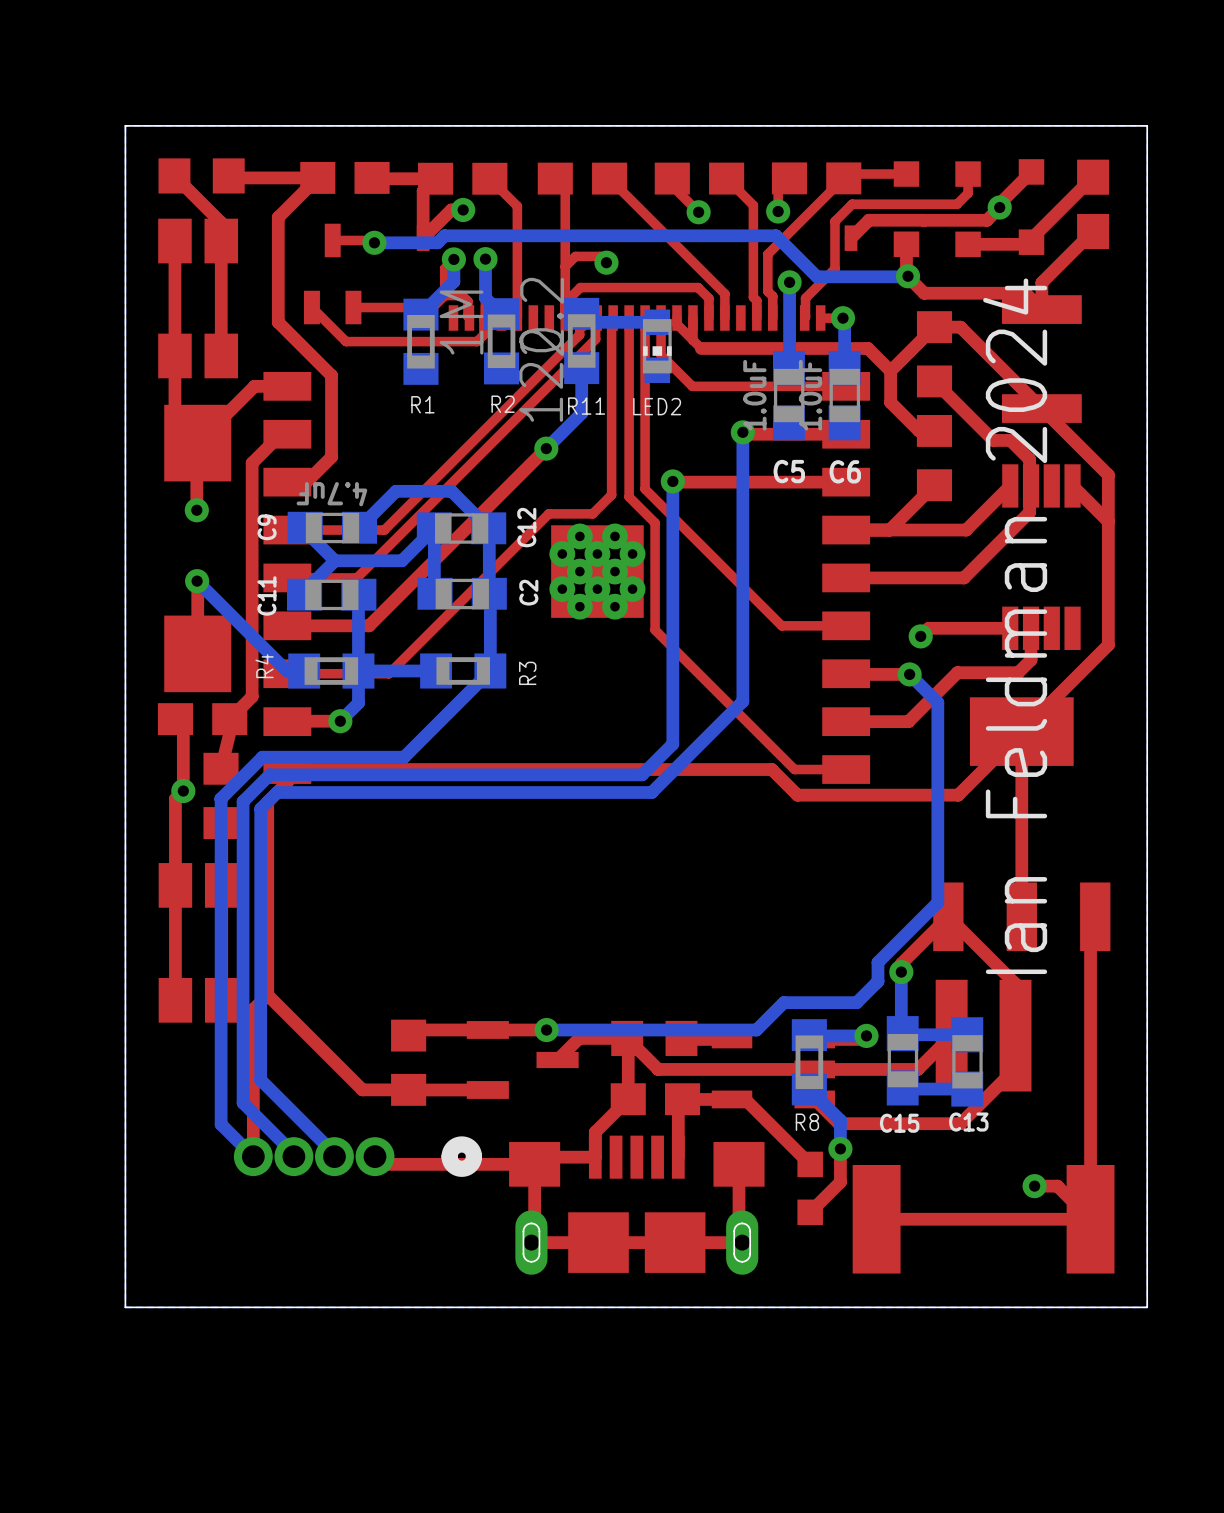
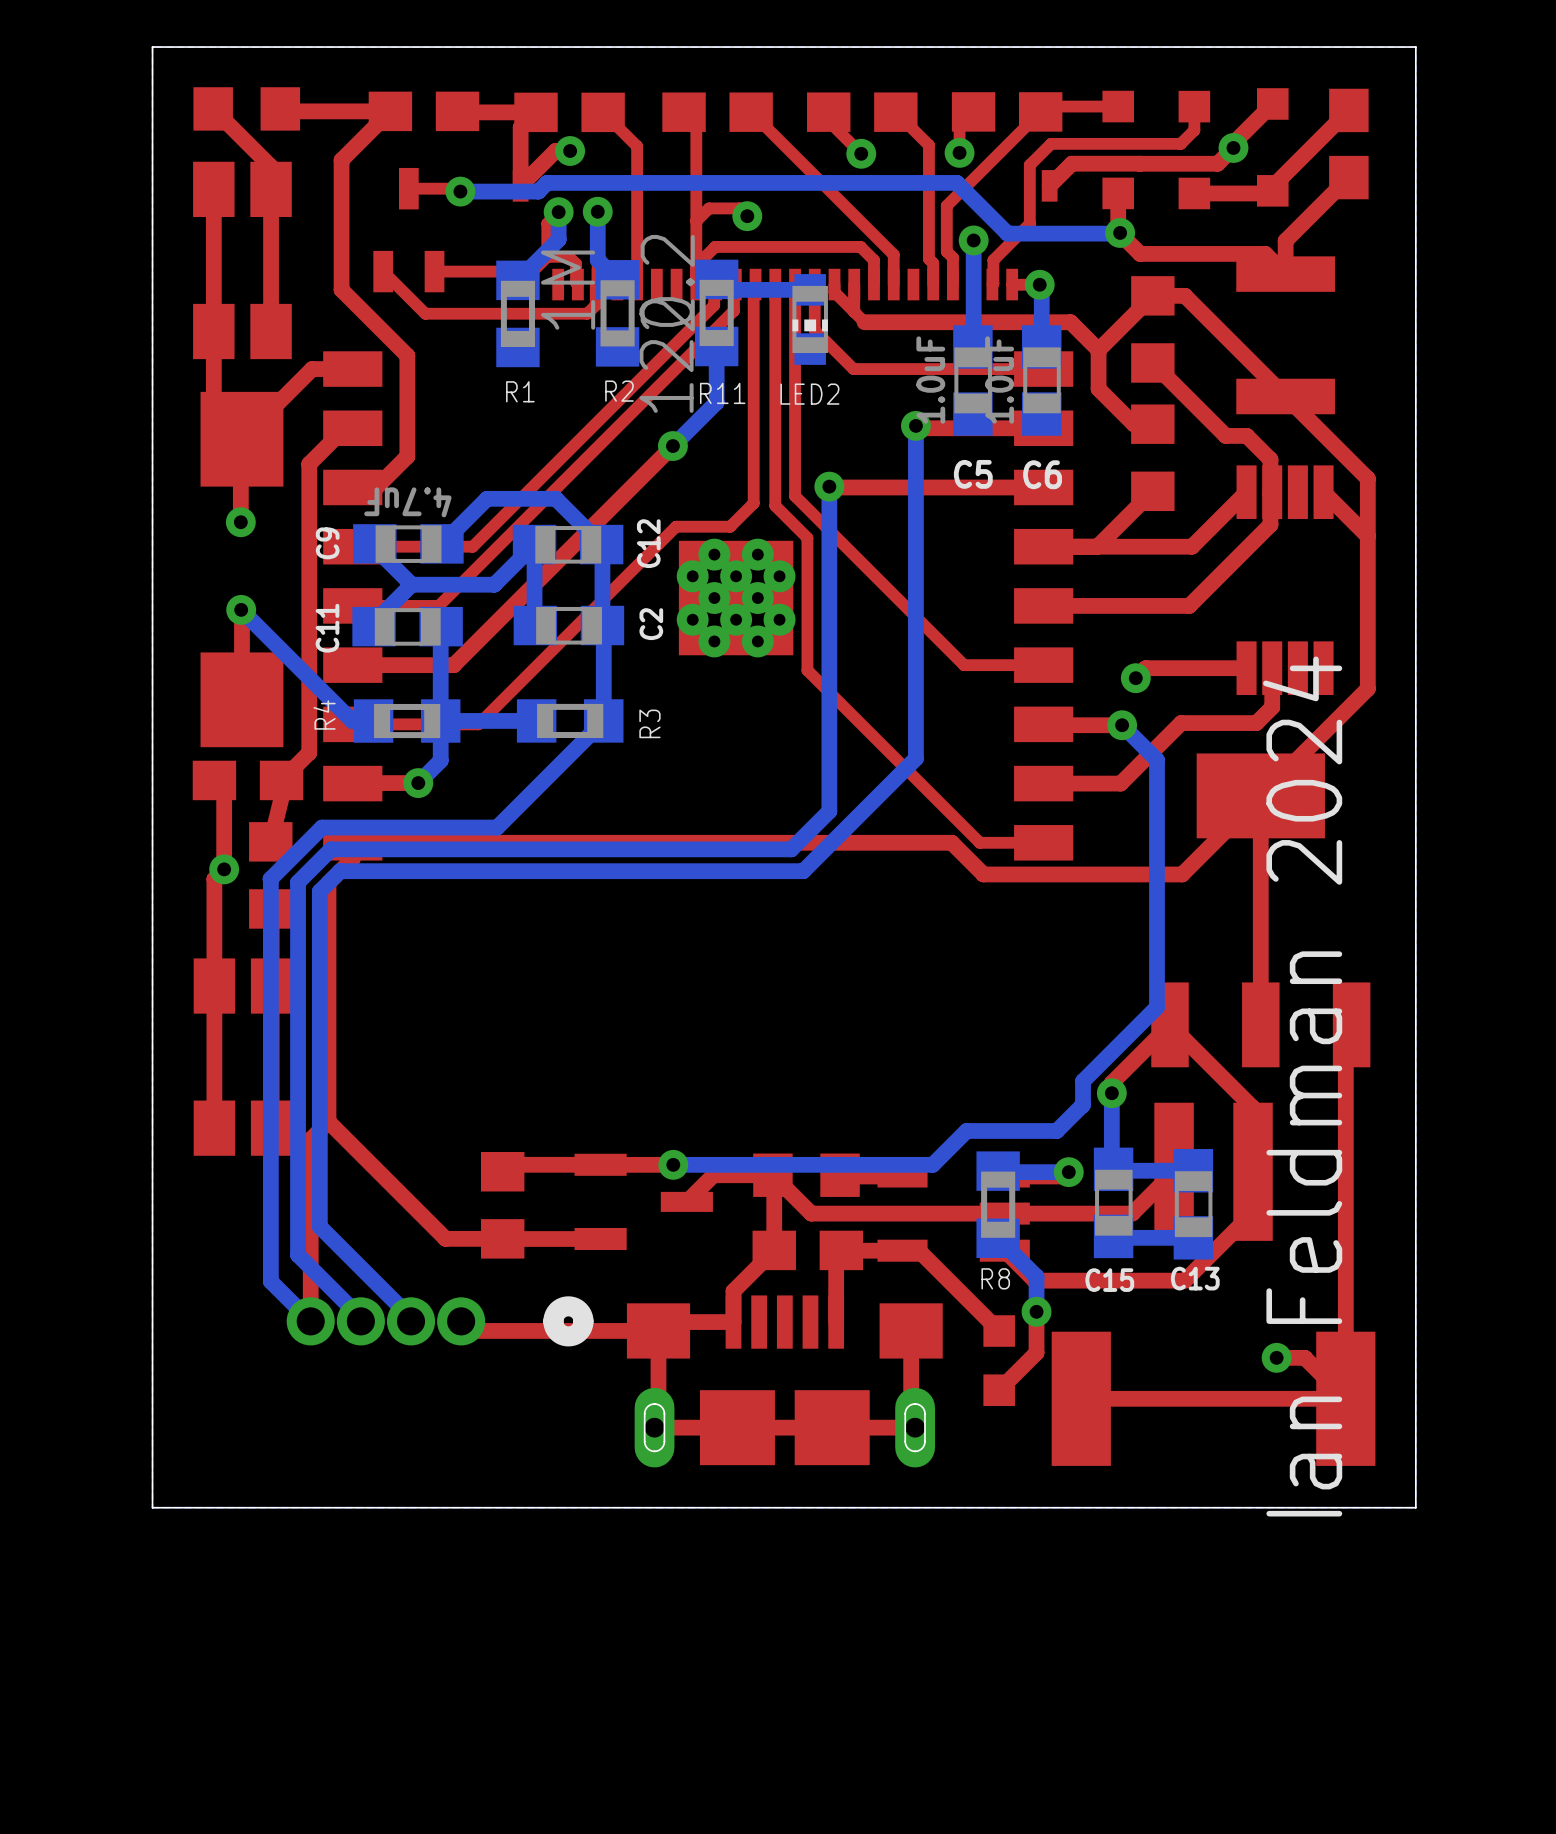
text position: Ian Feldman 2024 (1015, 626) -> Ian Feldman 2024 (1302, 1086)

